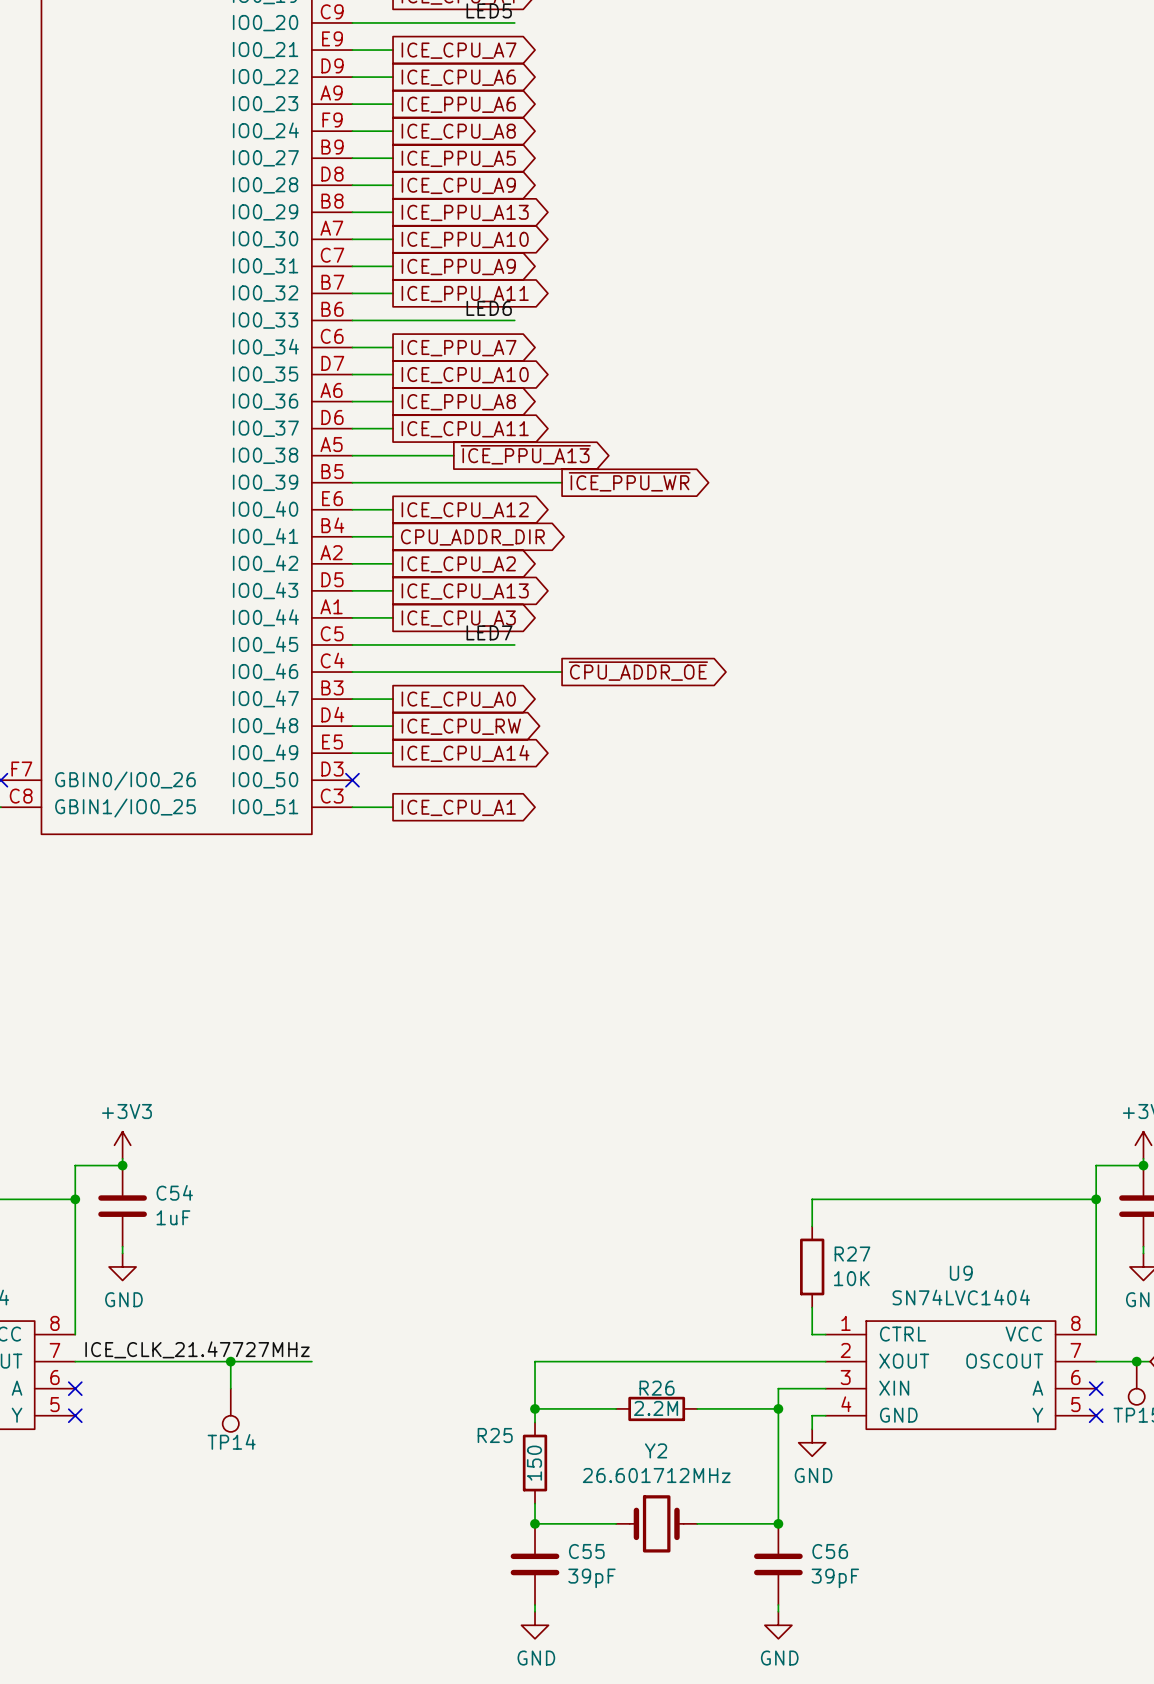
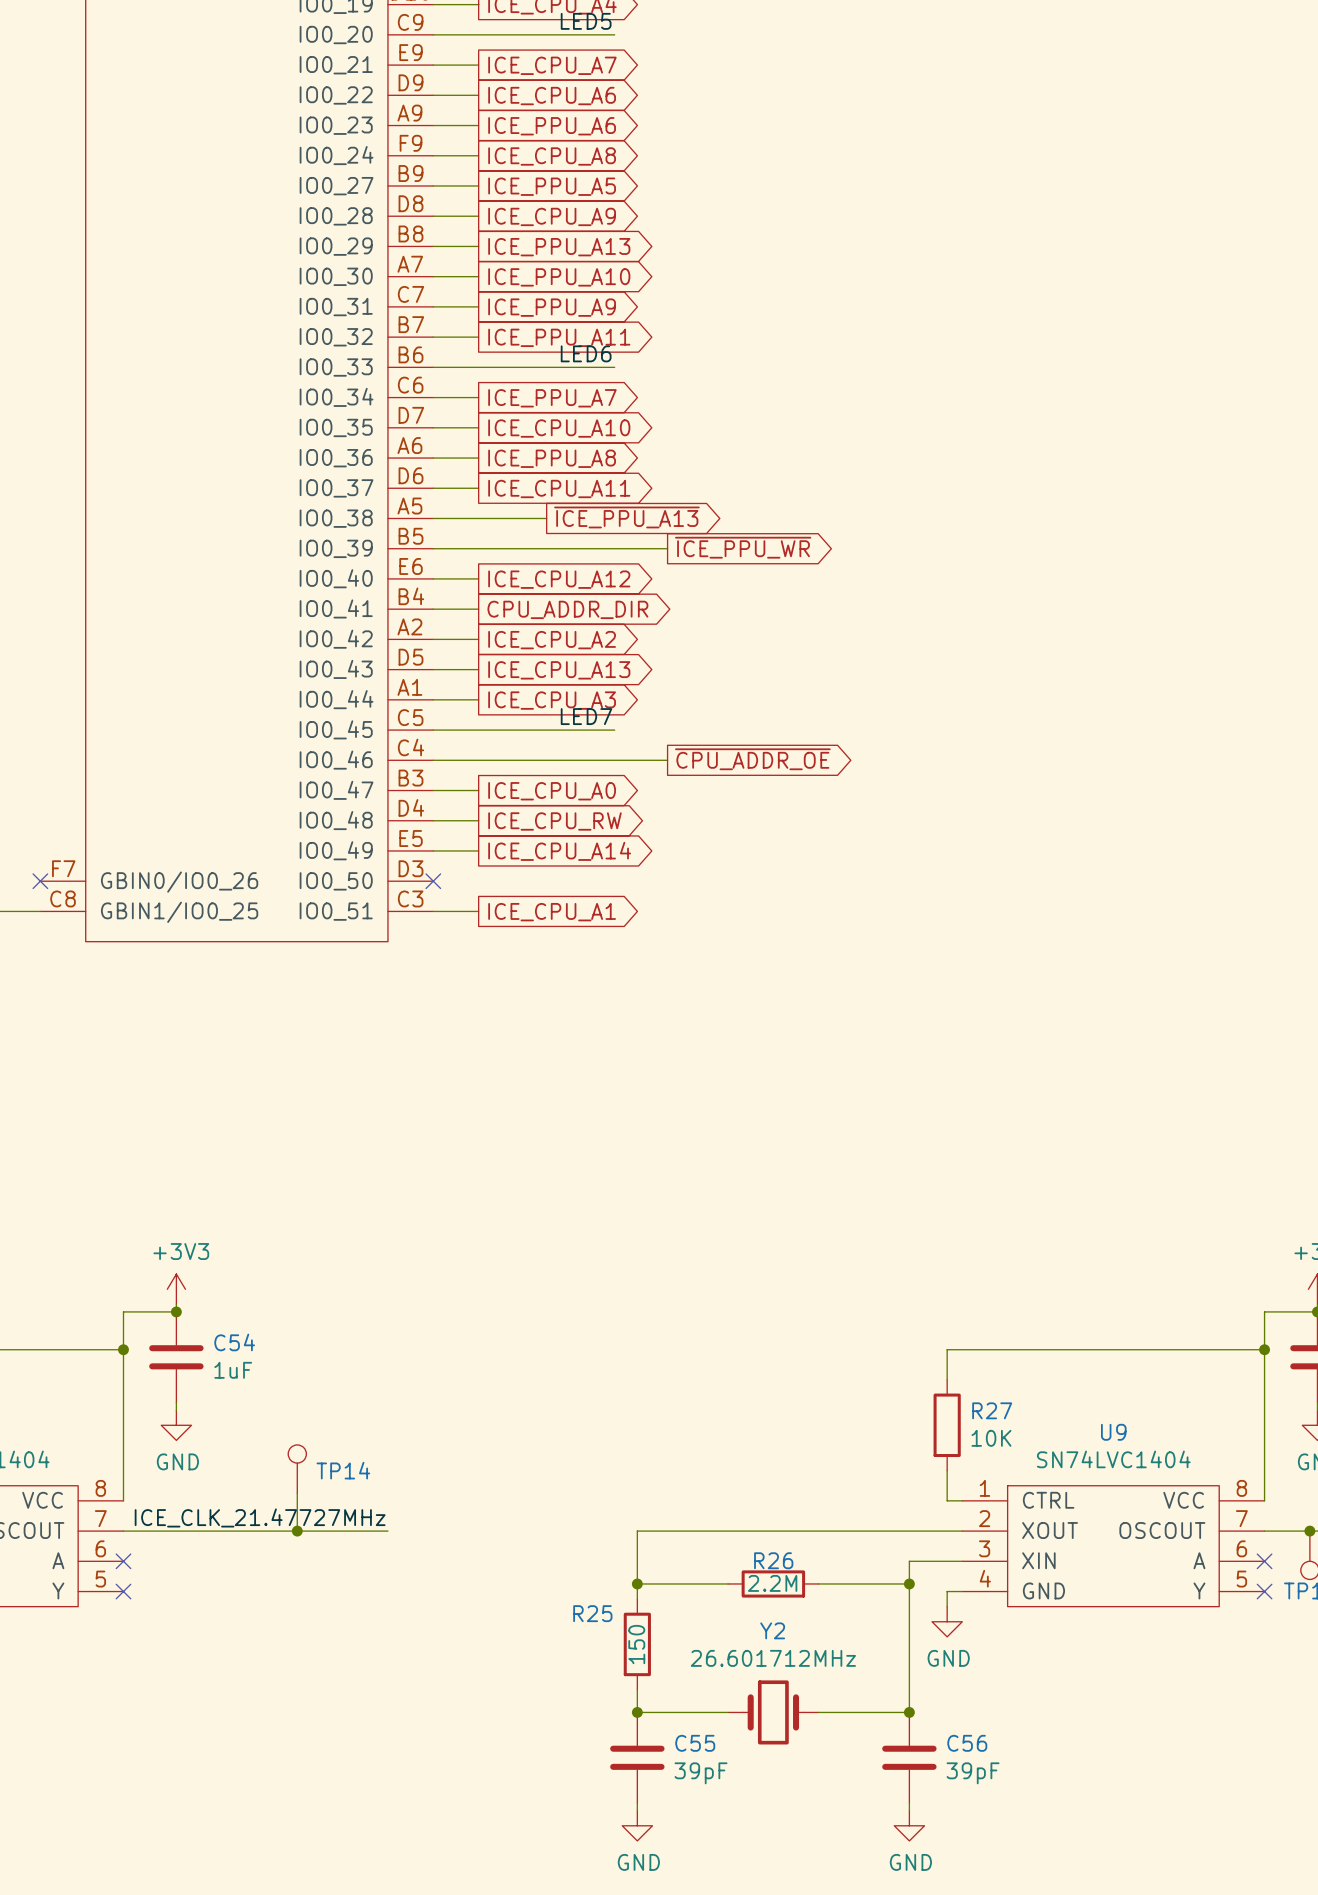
wire: (230, 1361) (230, 1388) -> (297, 1531) (297, 1493)
TP14 position: (230, 1410) -> (297, 1469)
TP14 rotation: 0° (230, 1423) -> 180° (297, 1454)
TP14 name position: TP14 (231, 1441) -> TP14 (343, 1470)

